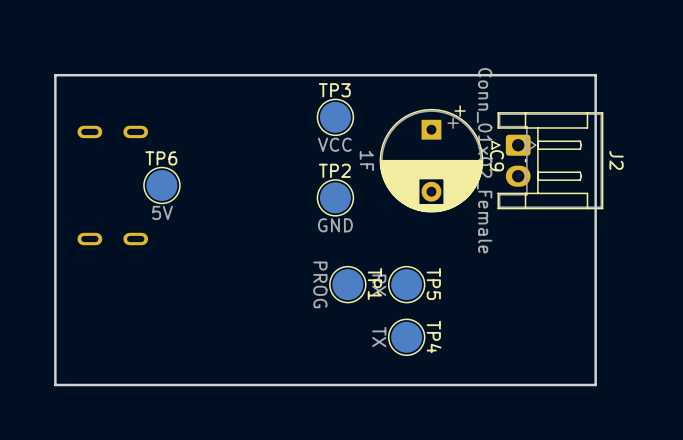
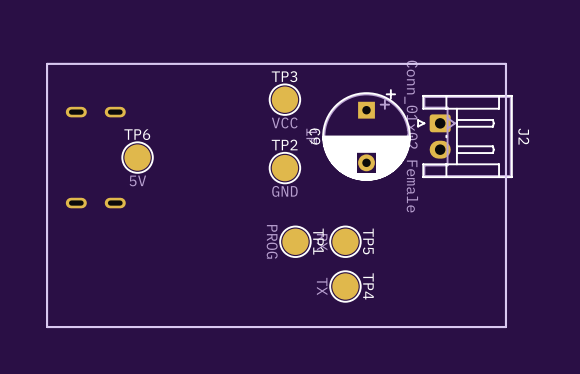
C9 name position: C9 (496, 160) -> C9 (314, 136)

